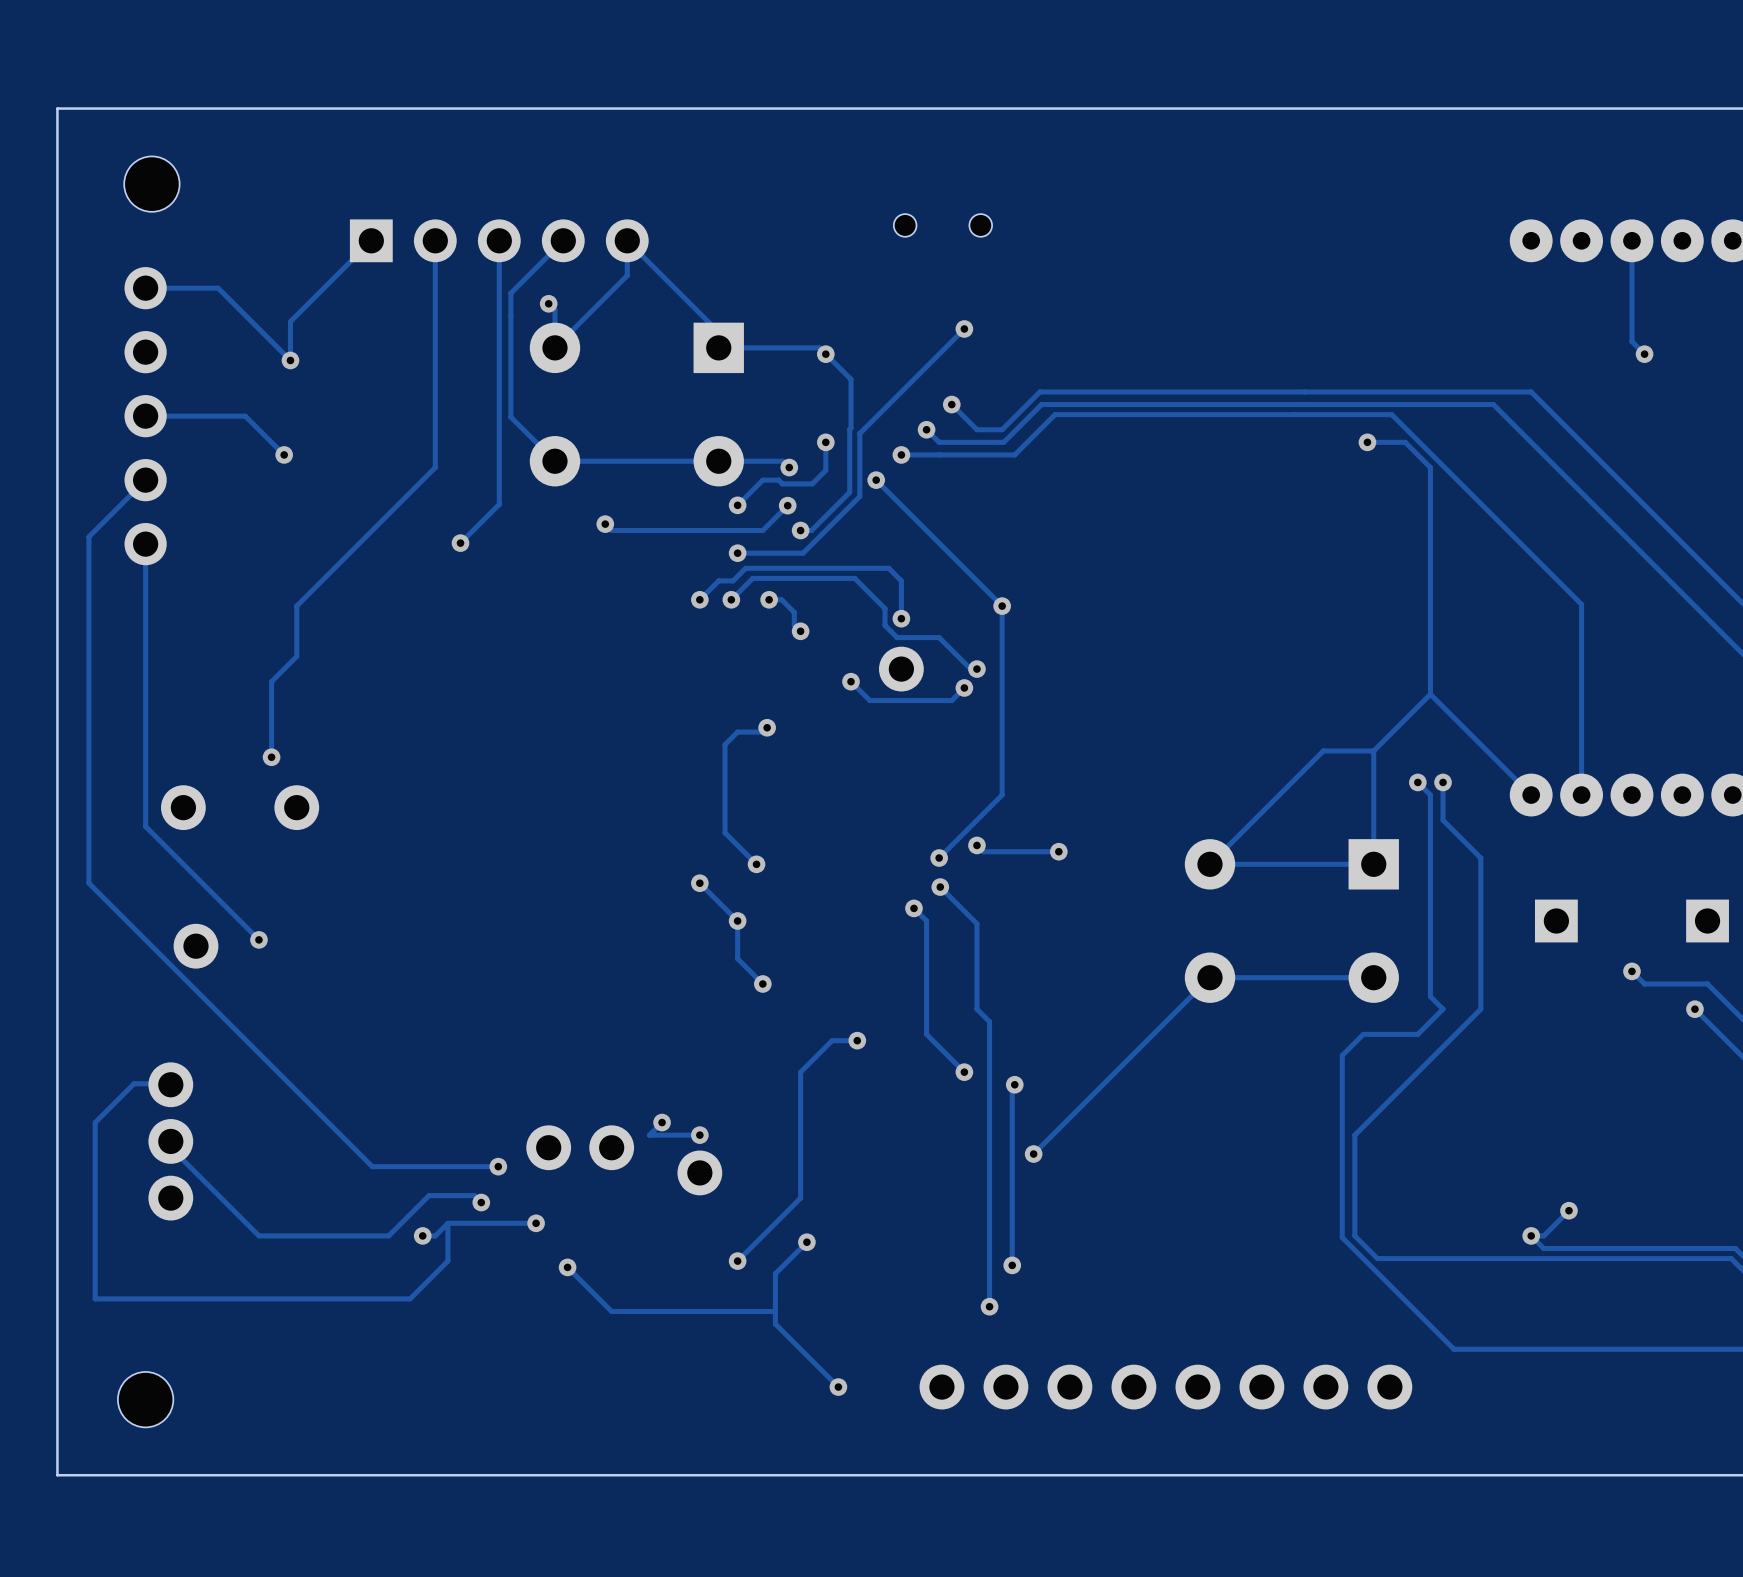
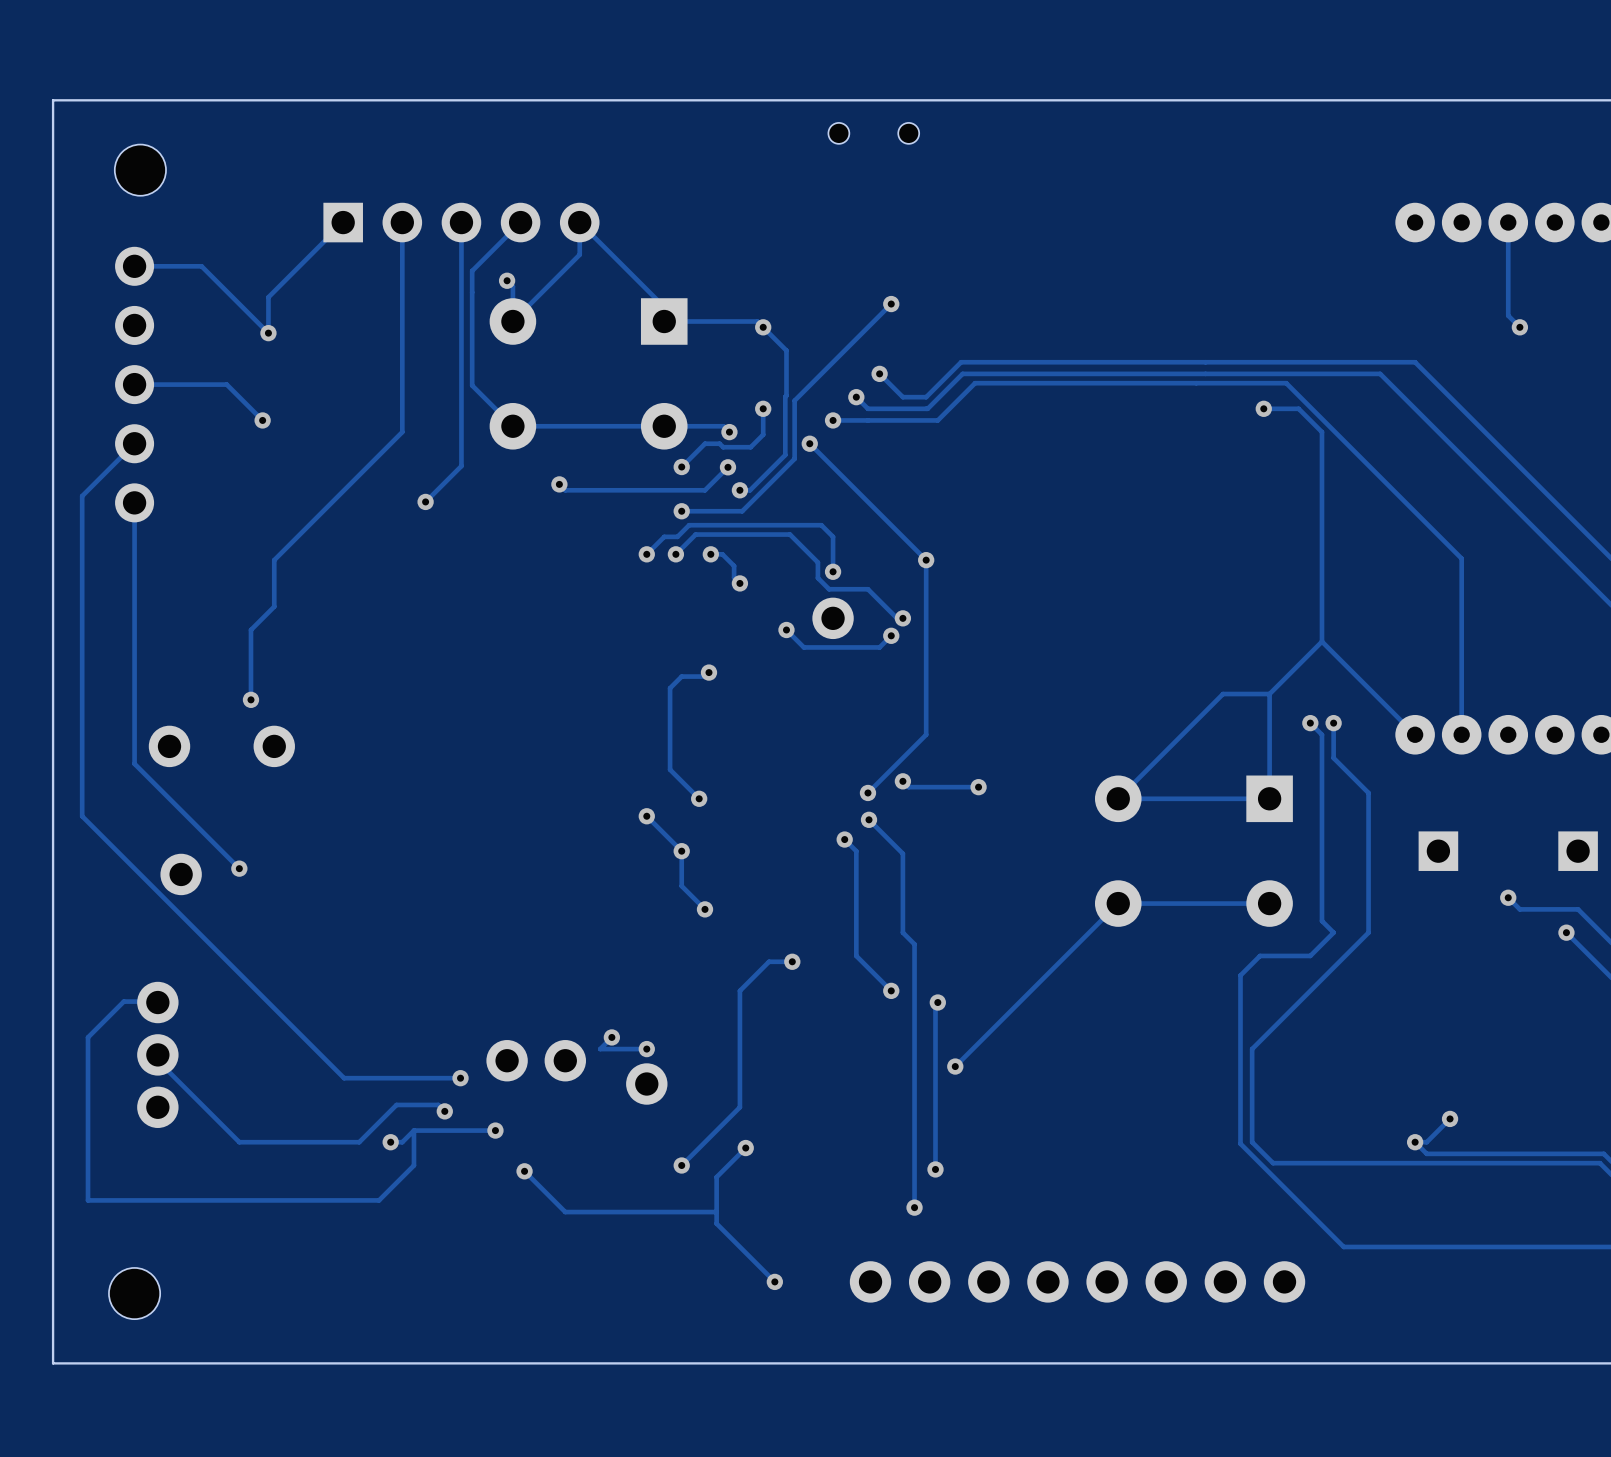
part position: (942, 225) -> (873, 133)

